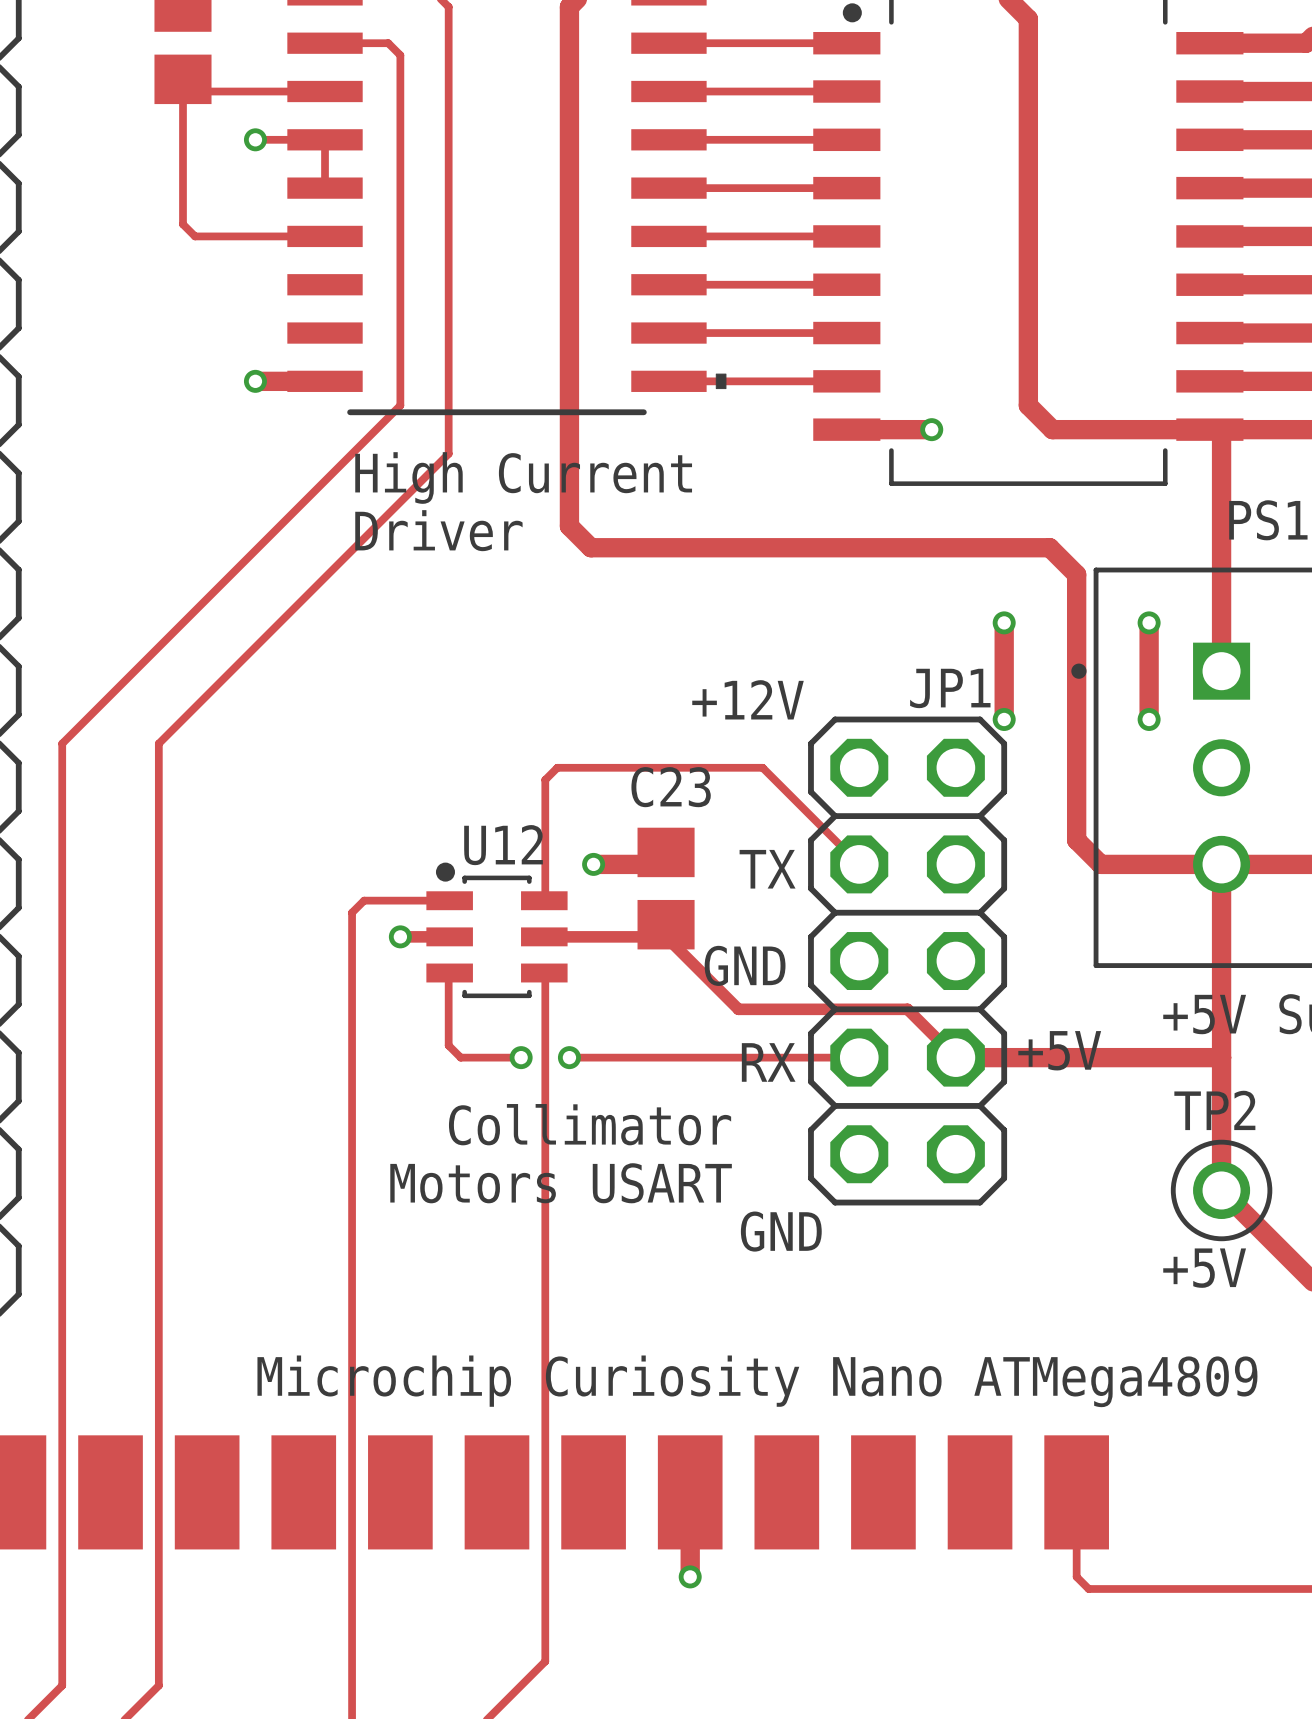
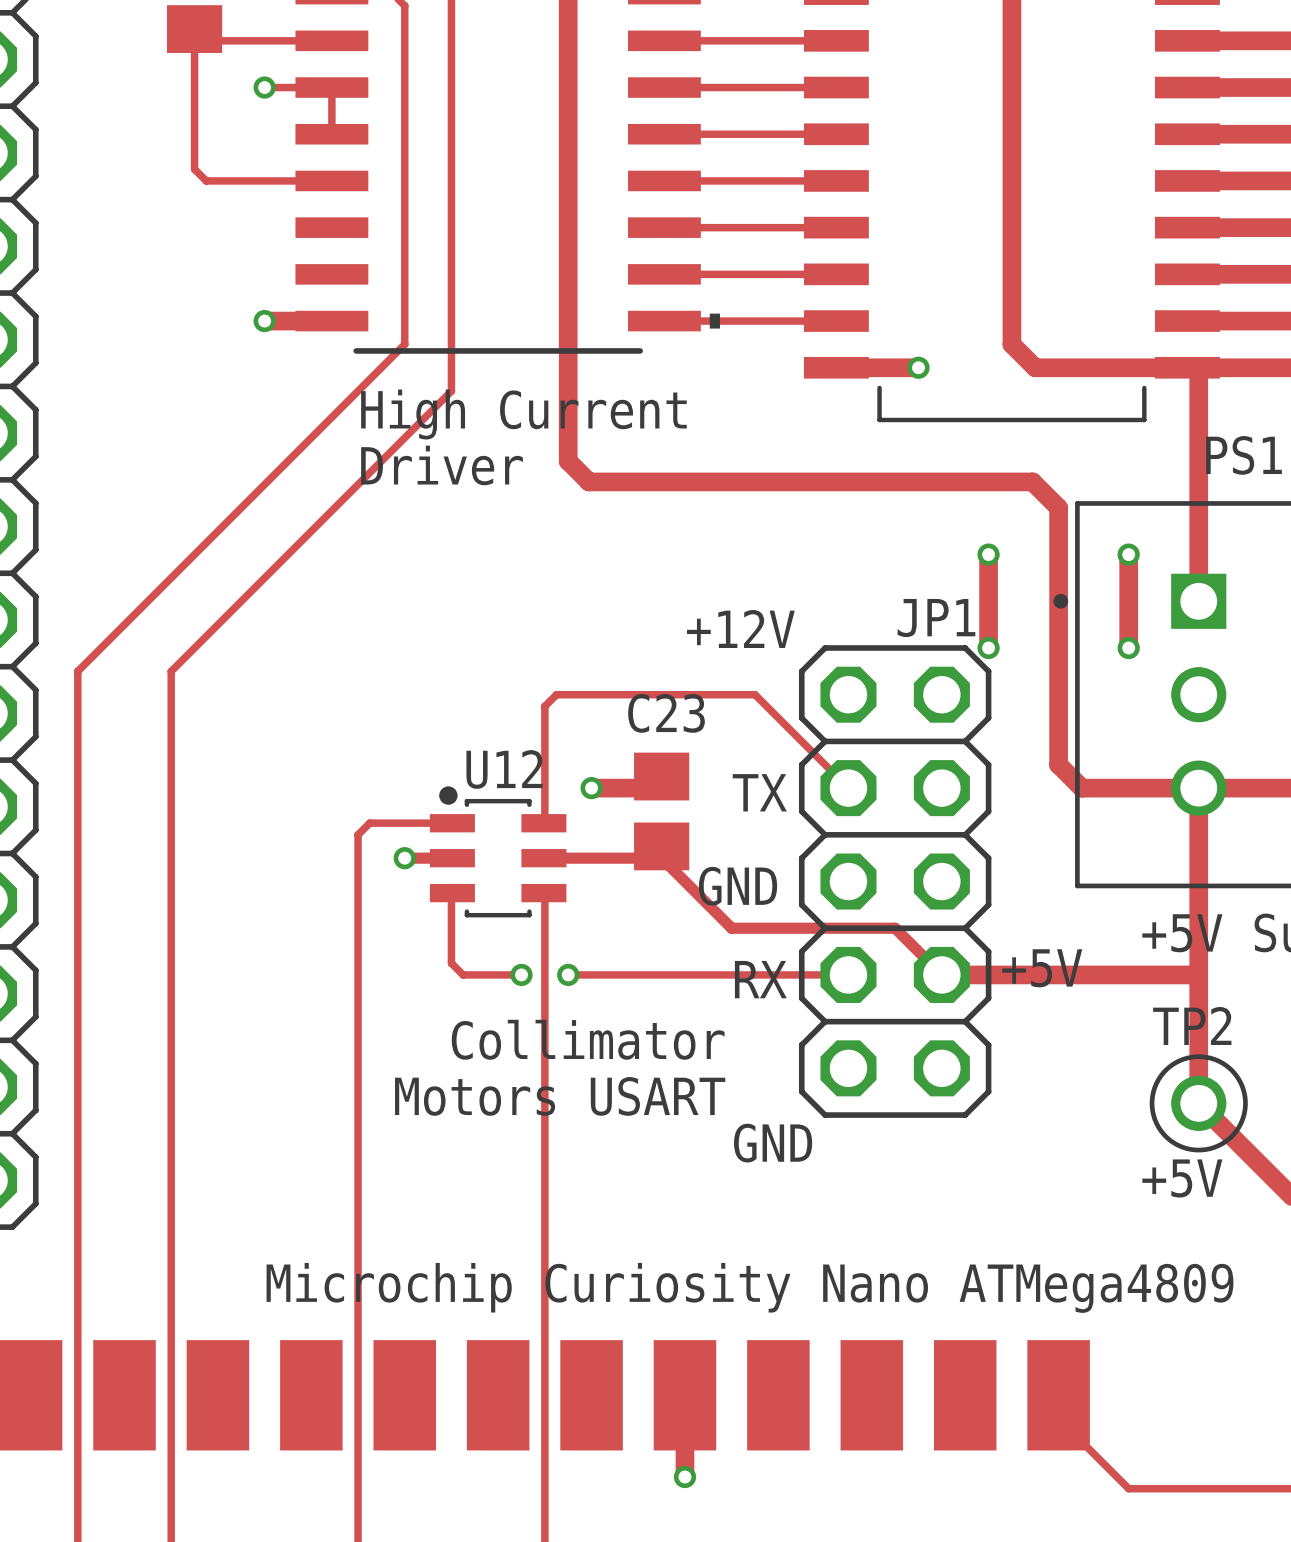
track: (1076, 1516) (1076, 1576) (1088, 1588) (1149, 1588) -> (1058, 1418) (1128, 1488)

